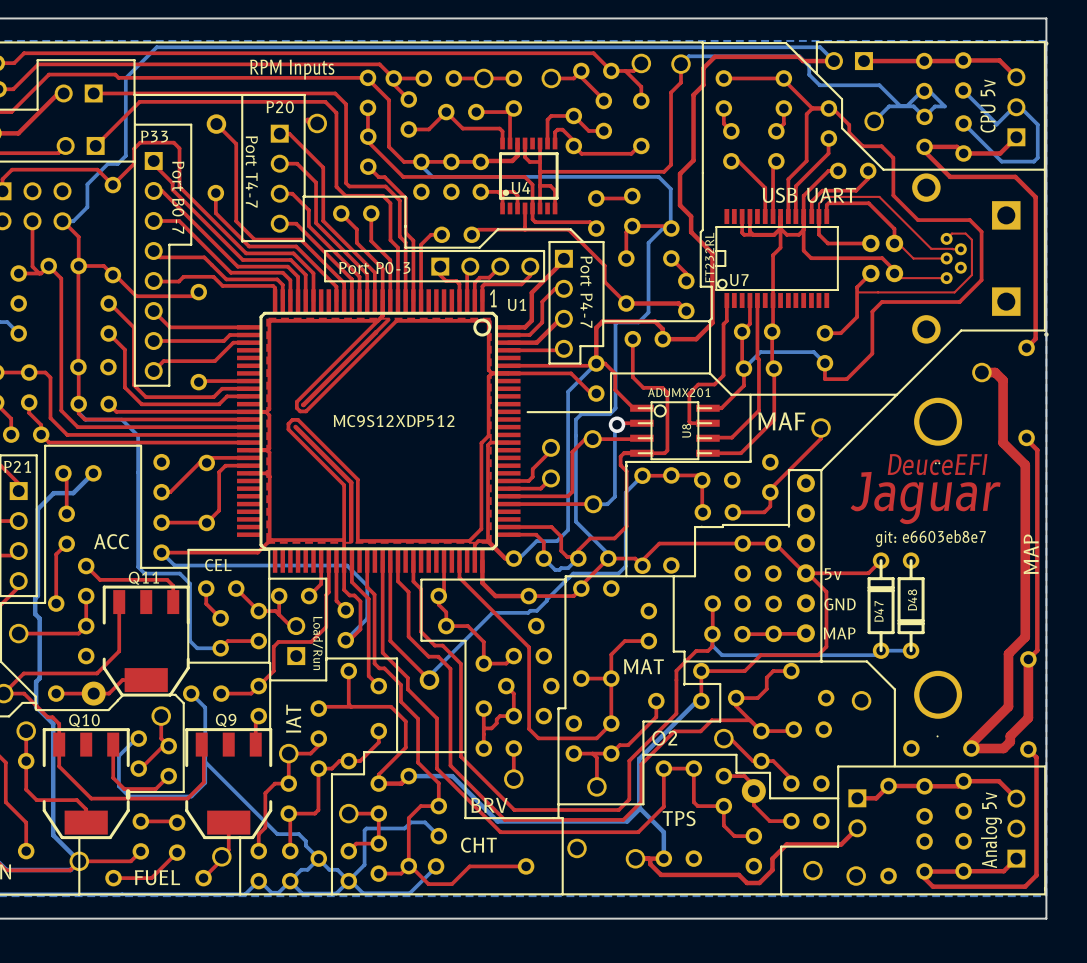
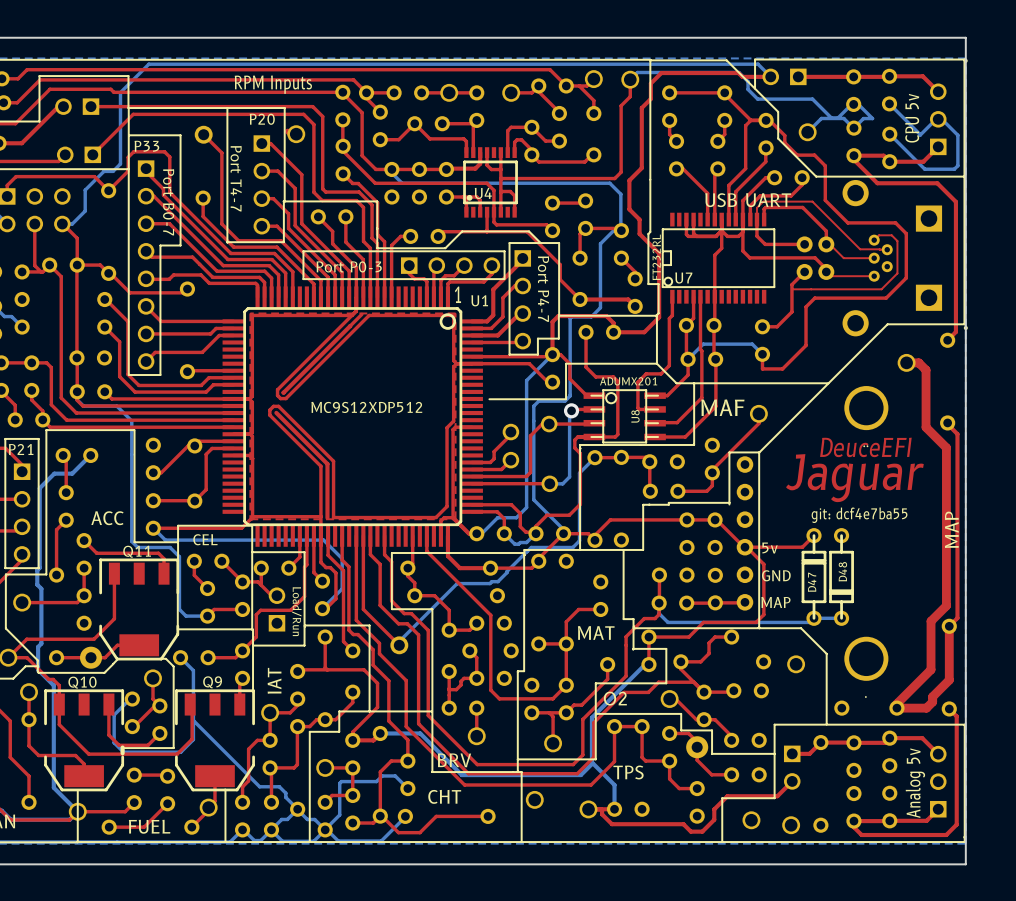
text: git: e6603eb8e7 (930, 538) -> git: dcf4e7ba55 (859, 515)

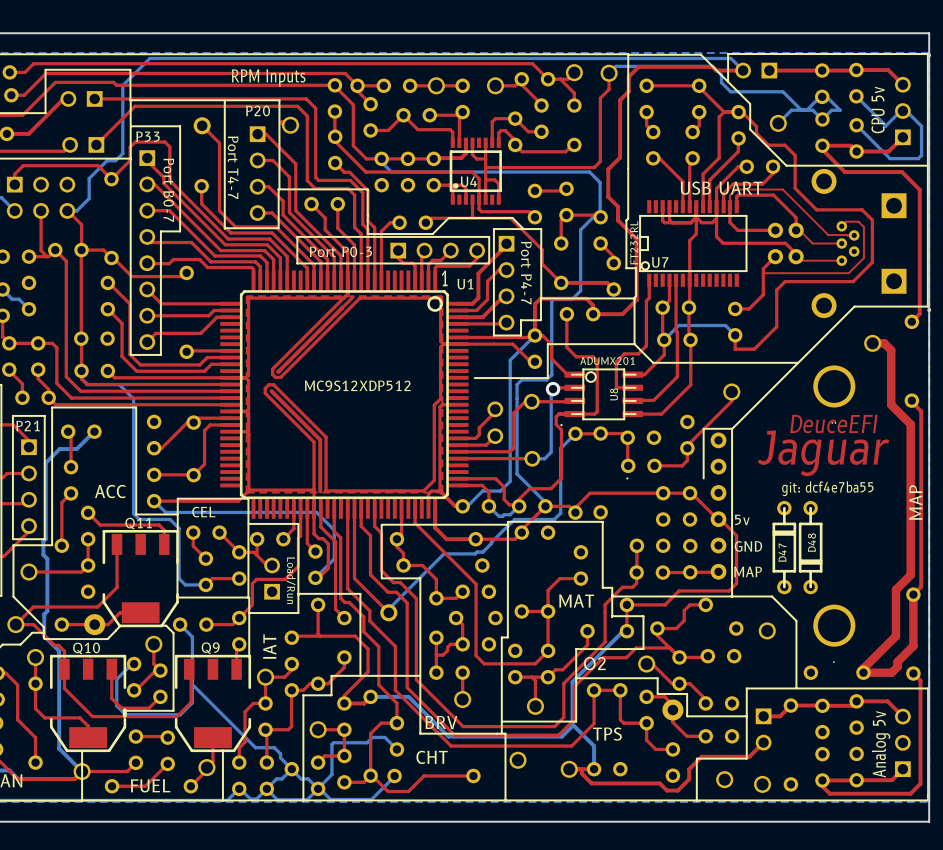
line: (694, 383) (694, 443) -> none
text: MAF (722, 407) -> none
line: (694, 443) (640, 444) -> none
line: (640, 444) (580, 444) (580, 549) -> none
line: (729, 502) (643, 504) (643, 549) (623, 549) -> none
top track: (814, 535) (802, 547) (746, 547) -> none
bottom track: (659, 603) (659, 613) (667, 622) (809, 622) (814, 618) (841, 618) -> none

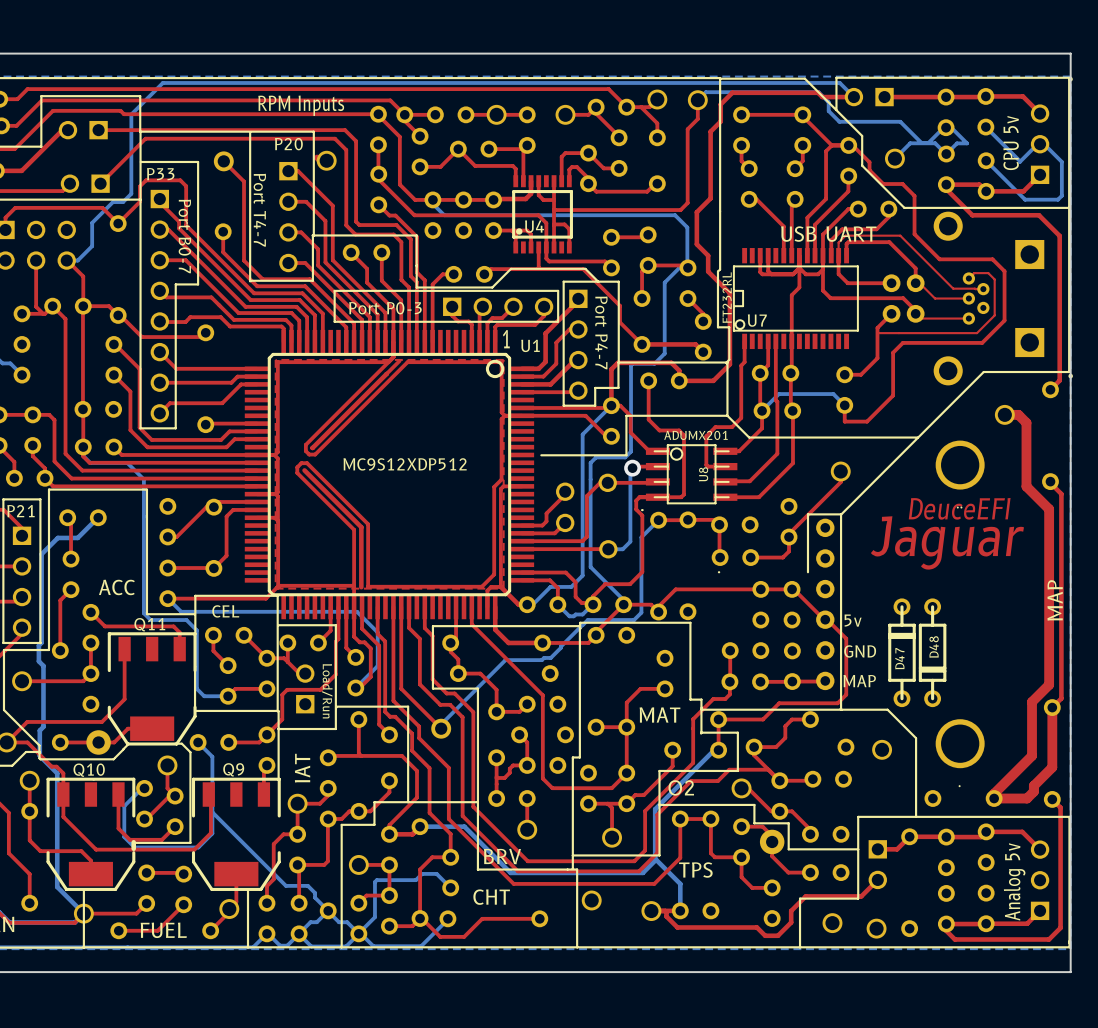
text: git: dcf4e7ba55 (827, 488) -> none

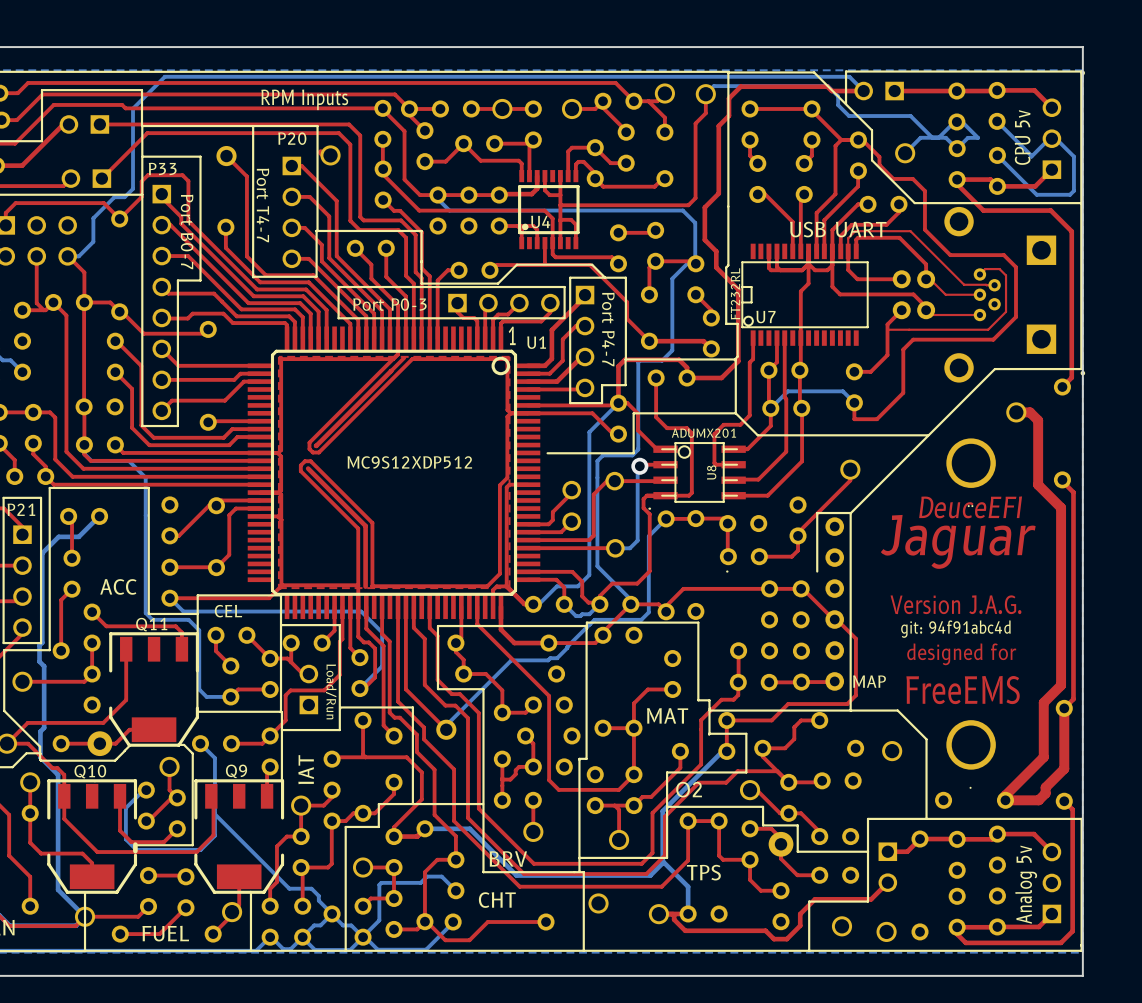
text: MAP (1055, 600) -> none
text: none -> Version J.A.G. (955, 604)
text: 5v (853, 620) -> none
text: none -> git: 94f91abc4d (955, 629)
text: GND (860, 651) -> none
D47: (901, 652) -> none
D48: (932, 652) -> none
text: none -> designed for (961, 654)
text: none -> FreeEMS (963, 690)

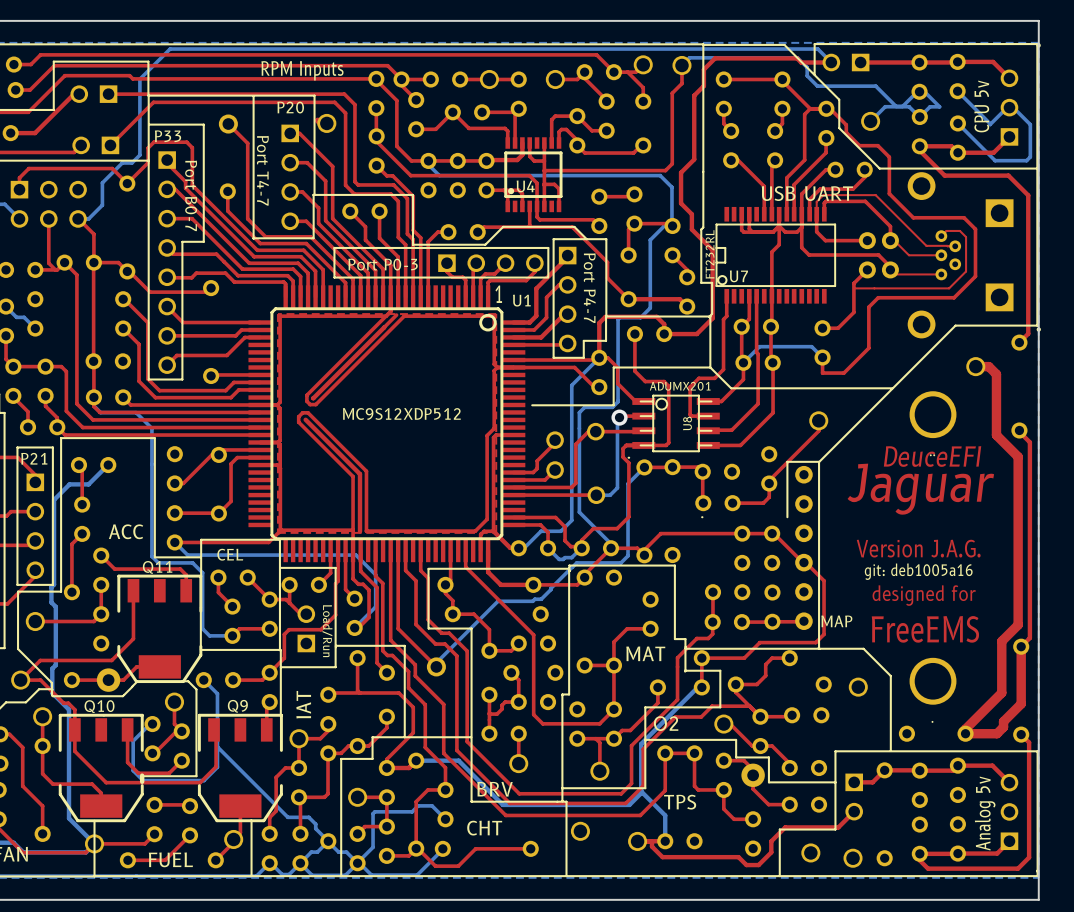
text: git: 94f91abc4d (955, 629) -> git: deb1005a16 (918, 571)

